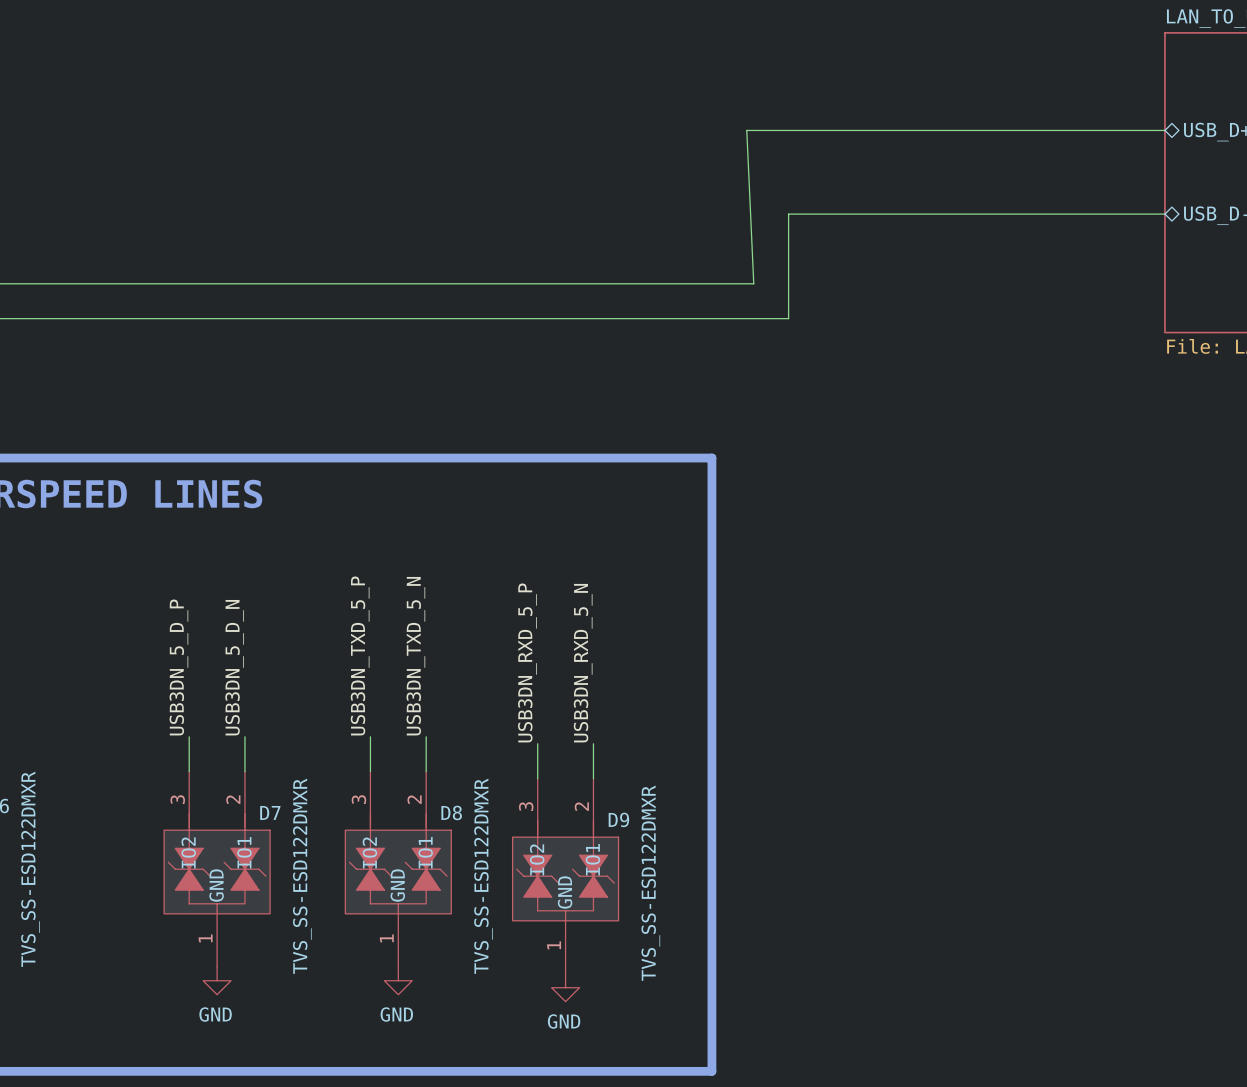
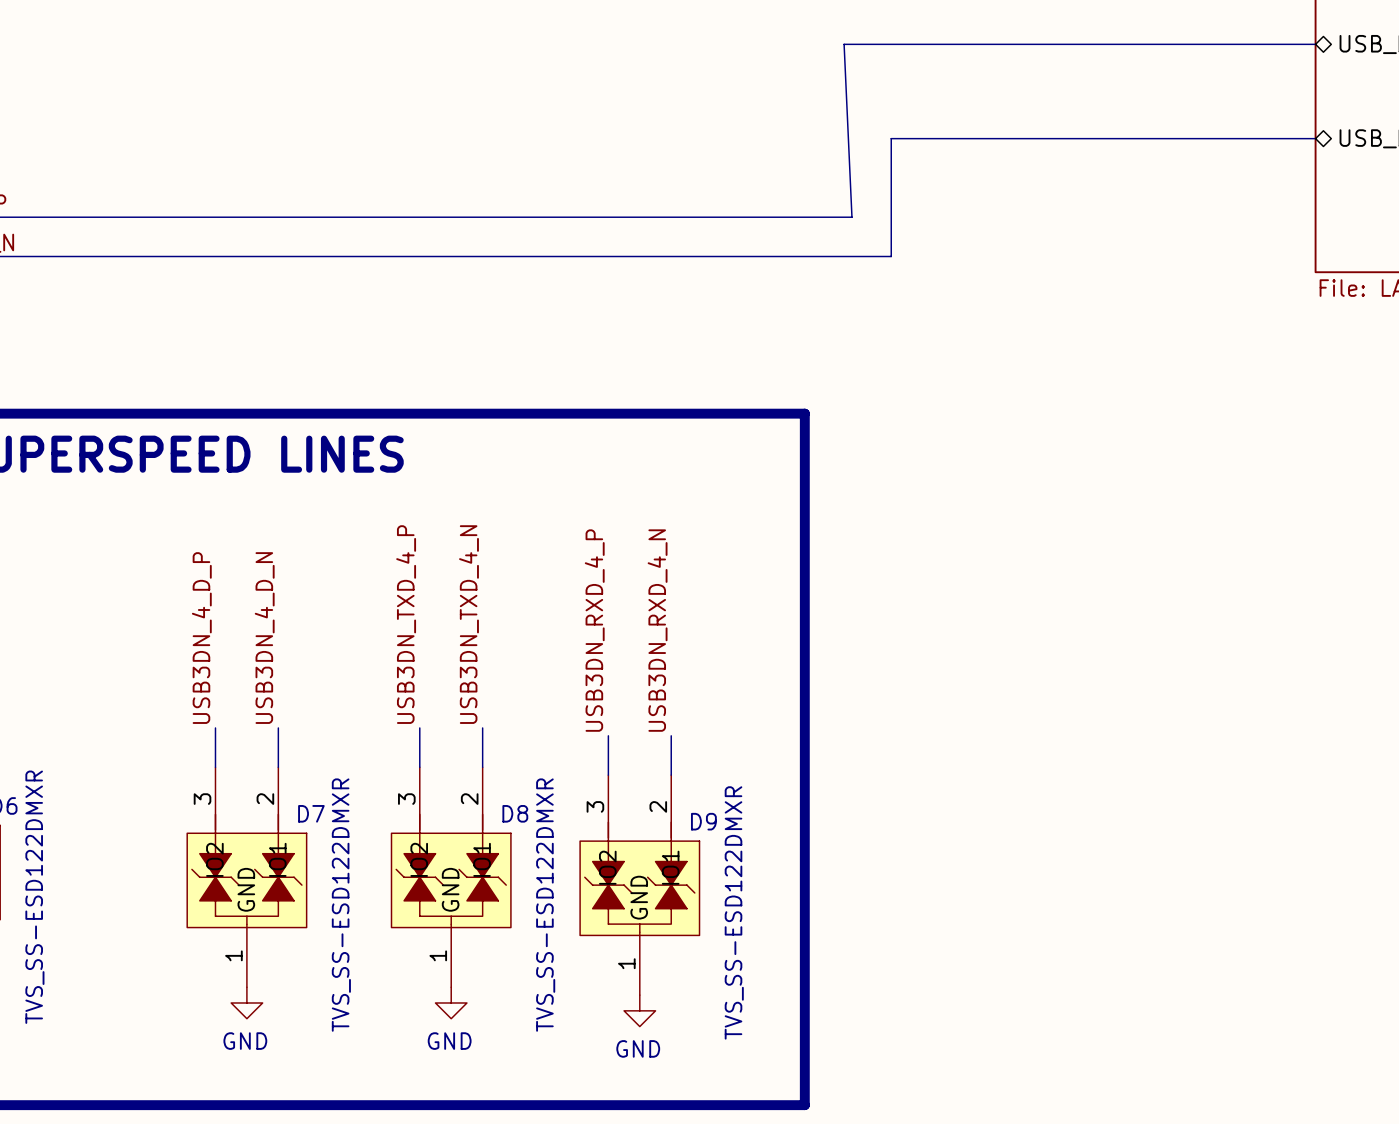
label: USB3DN_TXD_5_P (360, 655) -> USB3DN_TXD_4_P (406, 624)
label: USB3DN_TXD_5_N (415, 656) -> USB3DN_TXD_4_N (469, 624)
label: USB3DN_RXD_5_P (527, 662) -> USB3DN_RXD_4_P (594, 630)
label: USB3DN_RXD_5_N (583, 663) -> USB3DN_RXD_4_N (657, 630)
label: USB3DN_5_D_P (178, 667) -> USB3DN_4_D_P (201, 638)
label: USB3DN_5_D_N (234, 667) -> USB3DN_4_D_N (264, 638)

